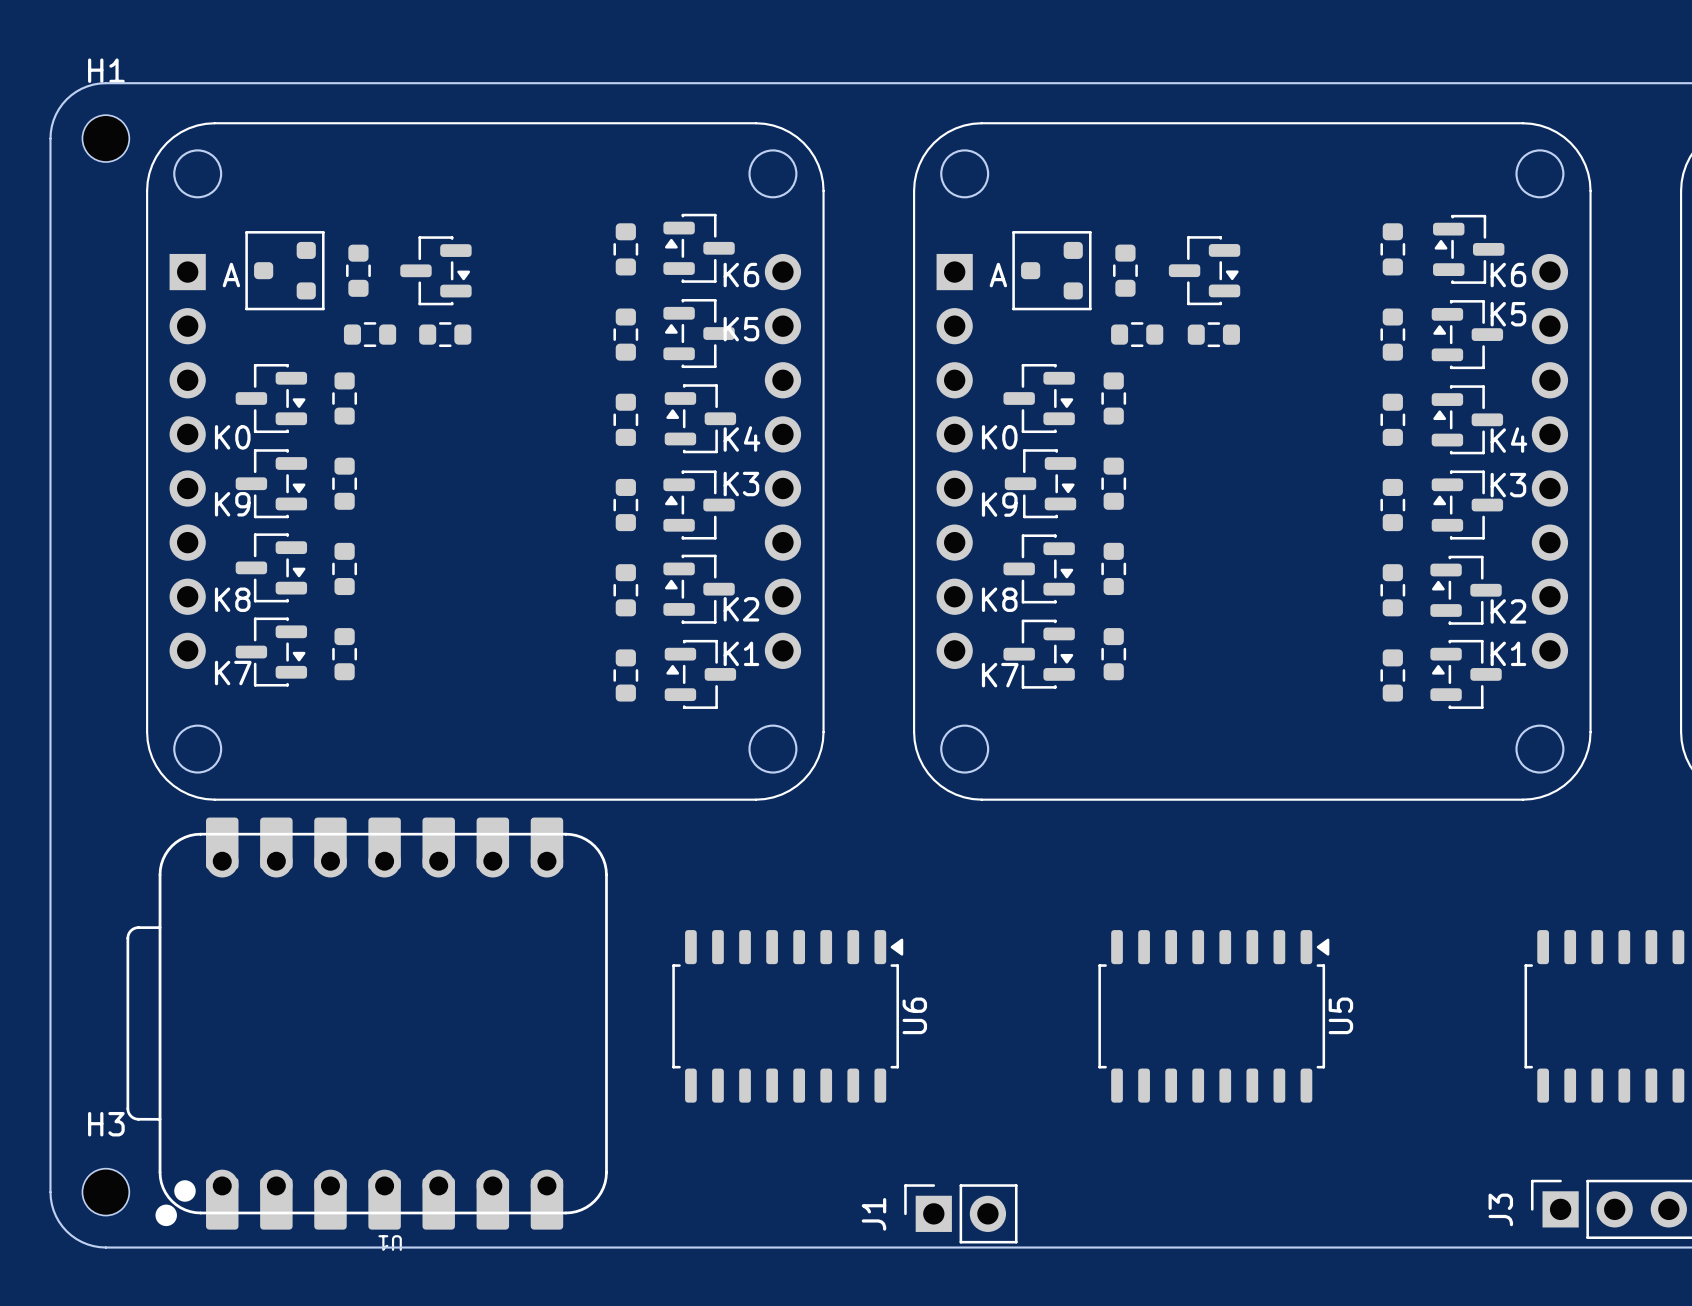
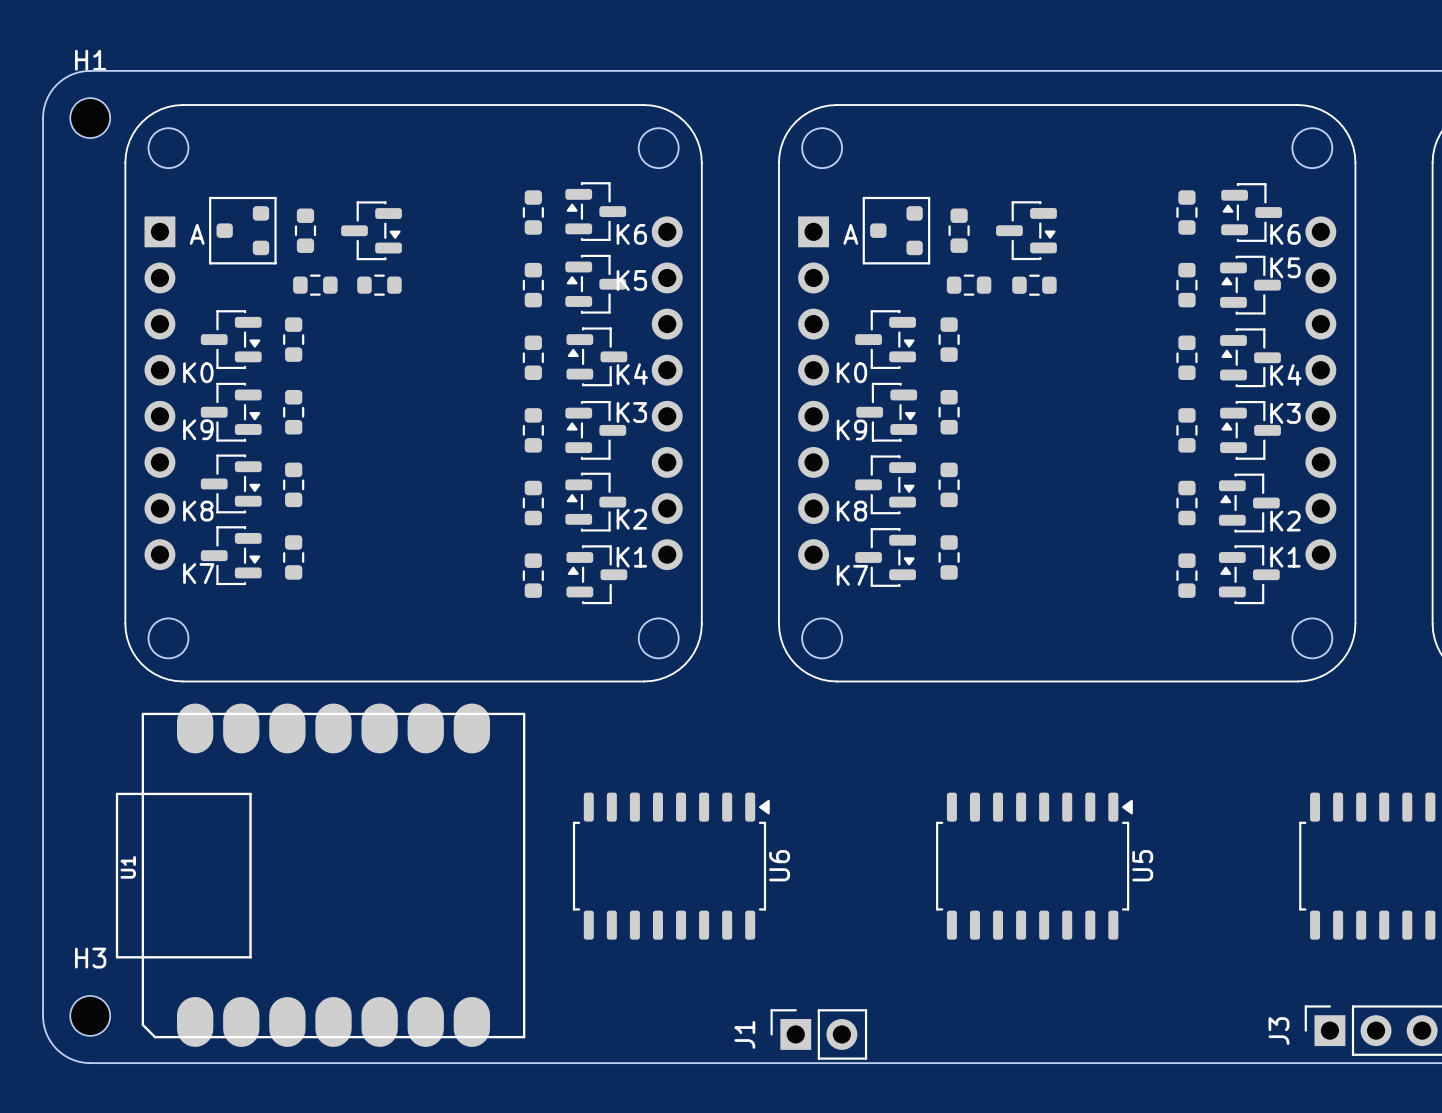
U1 footprint: [126, 817, 608, 1230] -> [115, 703, 526, 1047]
U1 name position: U1 (390, 1243) -> U1 (128, 867)

